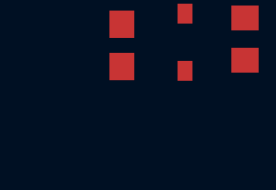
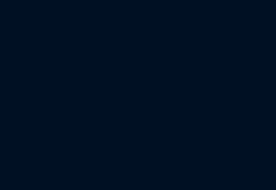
part: (244, 39) -> none
part: (184, 42) -> none
part: (121, 45) -> none

